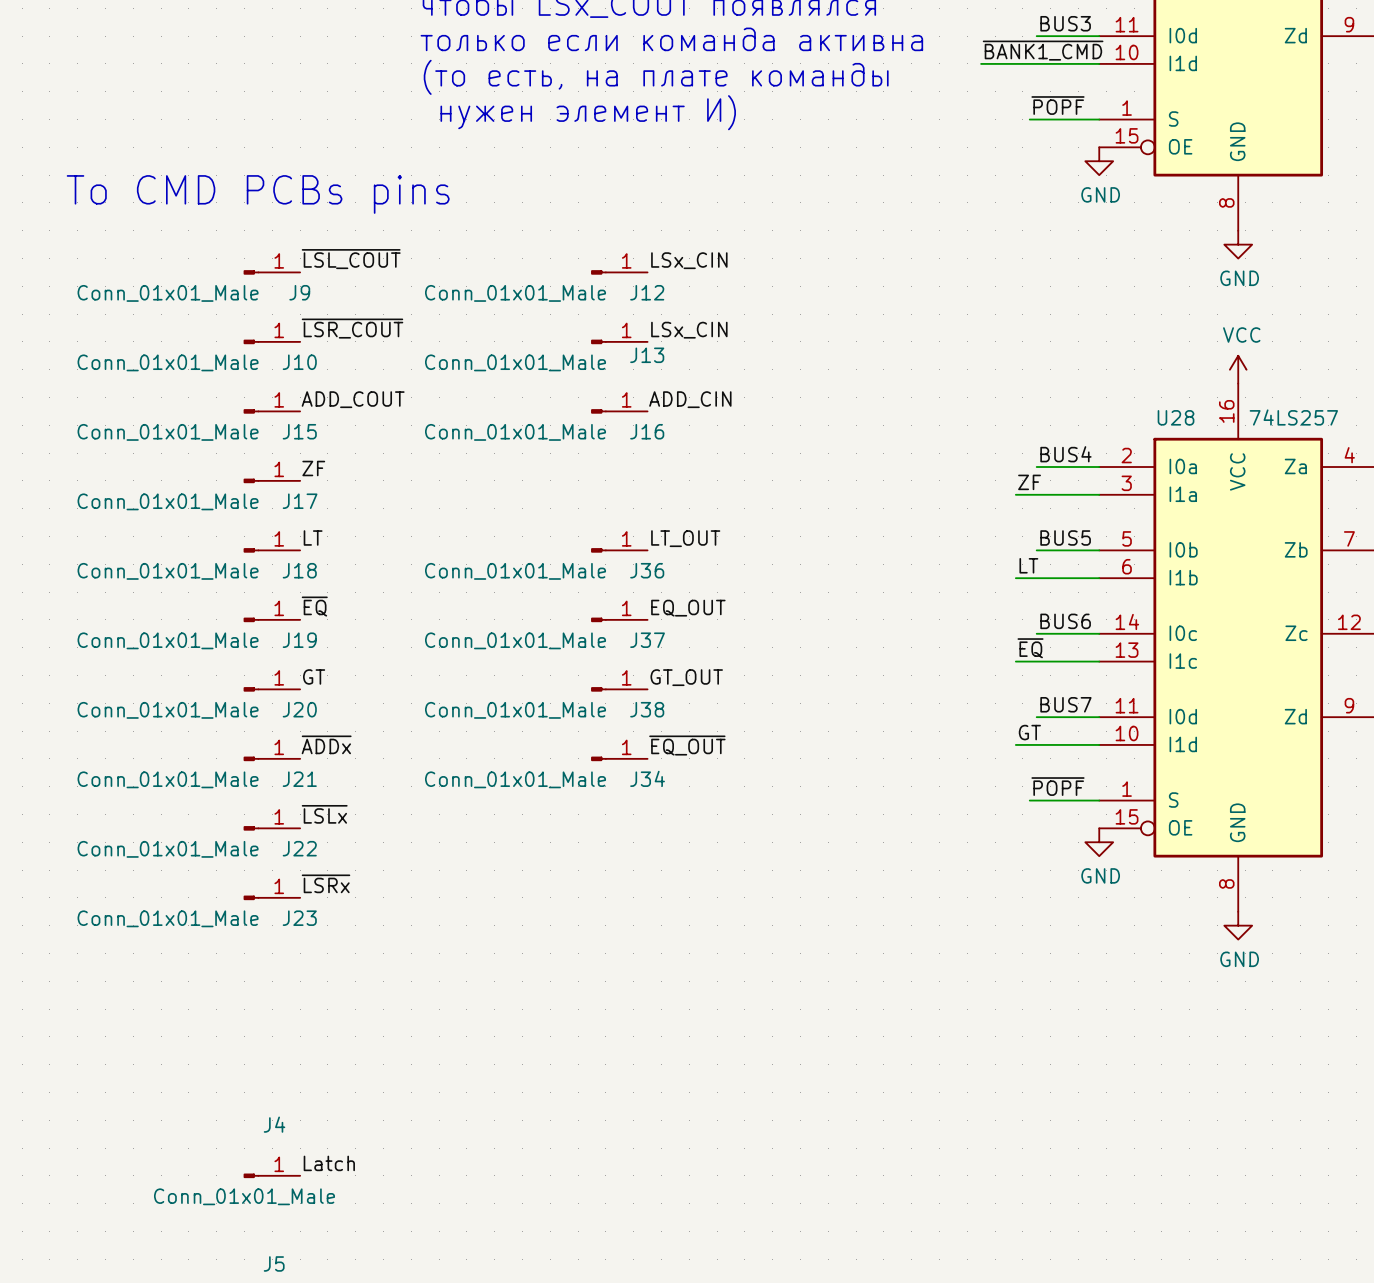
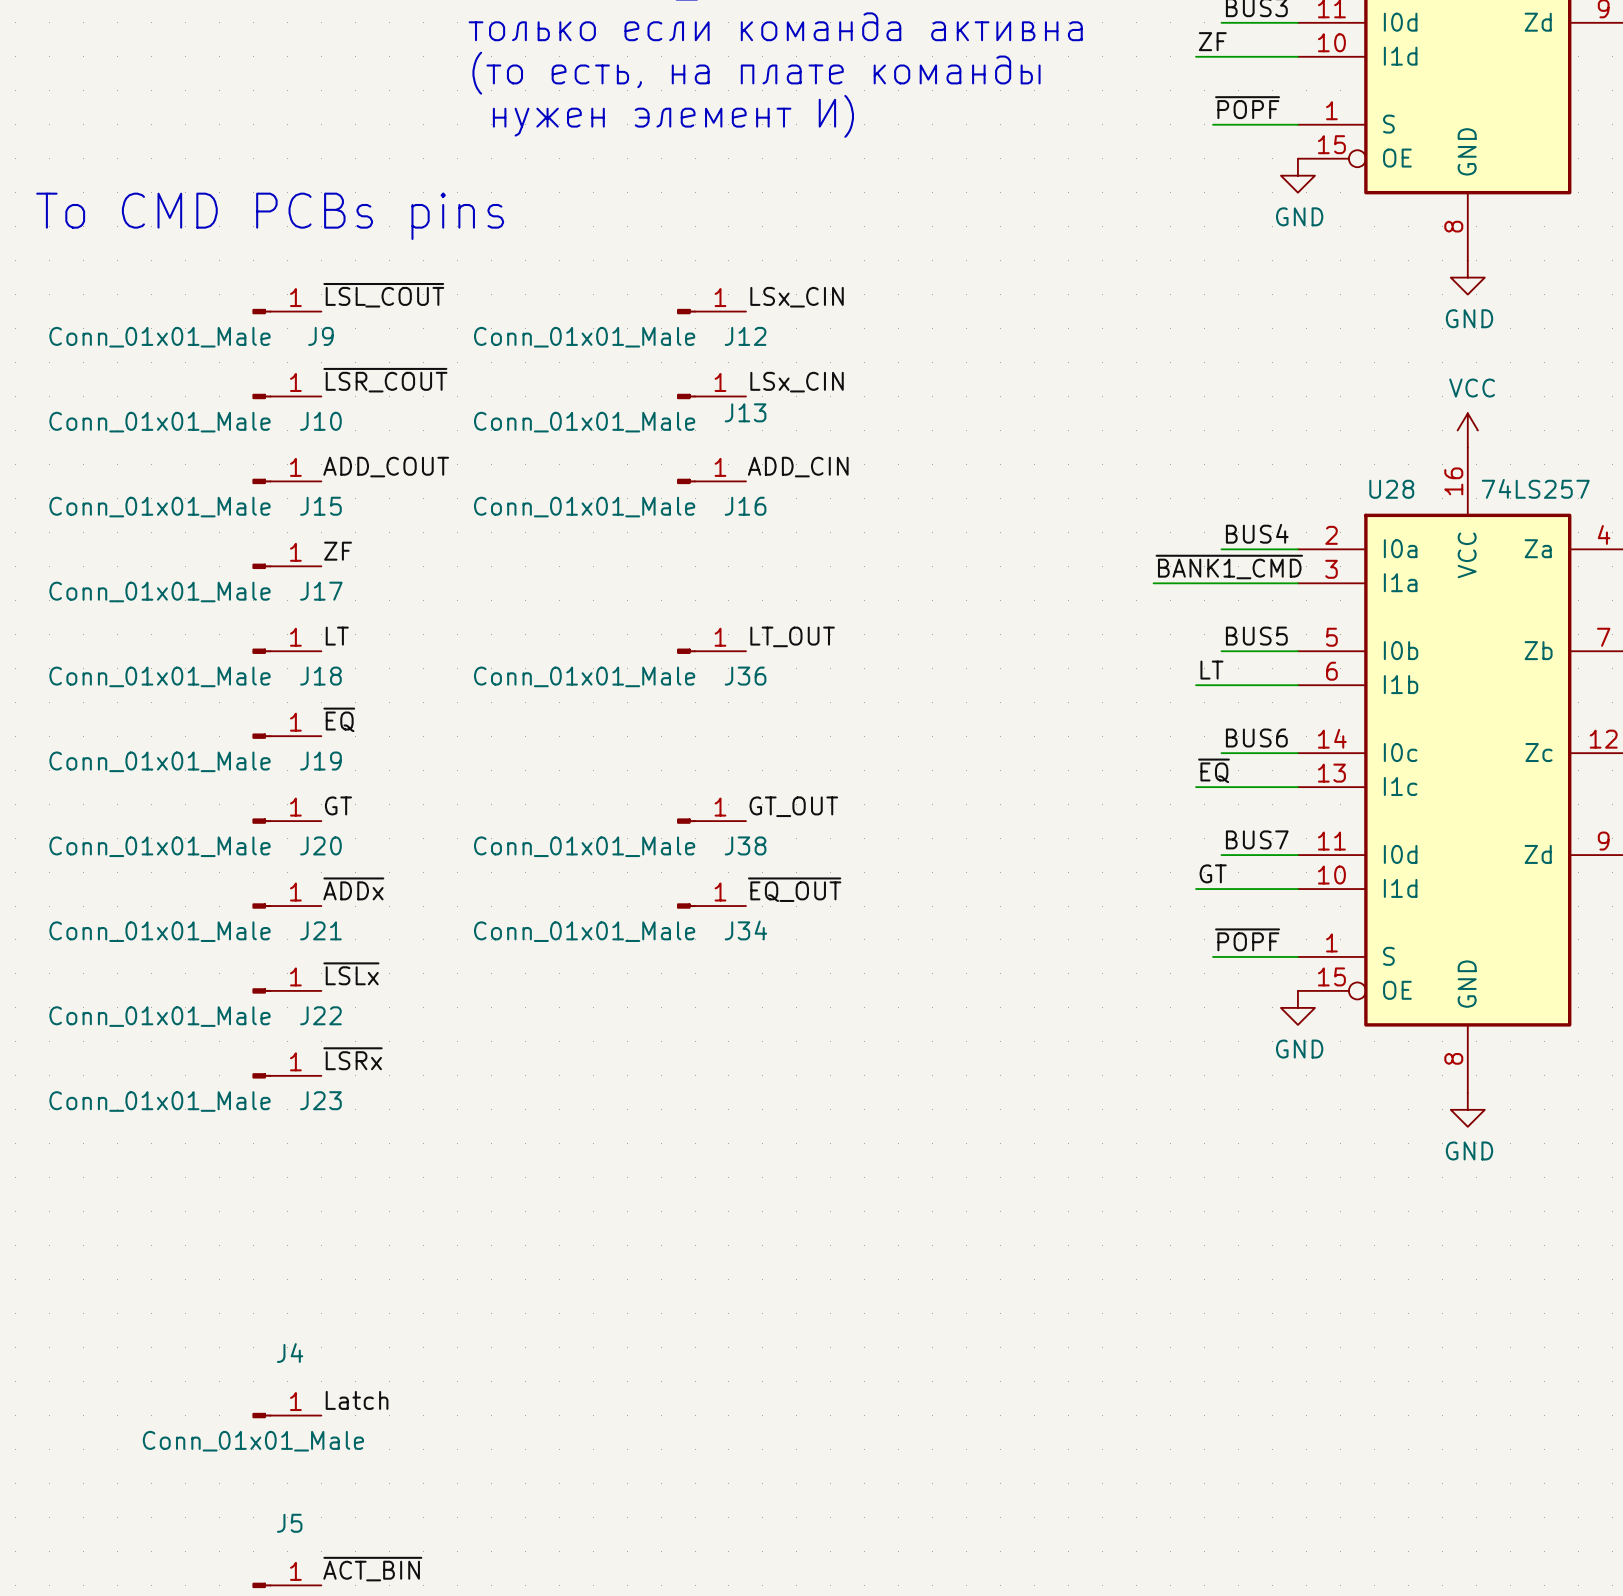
label: ~{BANK1_CMD} (1043, 50) -> none
label: none -> ZF (1212, 41)
wire: (981, 63) (1015, 63) -> none
label: none -> ~{BANK1_CMD} (1229, 567)
label: ZF (1029, 482) -> none
wire: none -> (1153, 583) (1196, 583)
label: EQ_OUT (688, 608) -> none
J37: Conn_01x01_Male (619, 619) -> none

